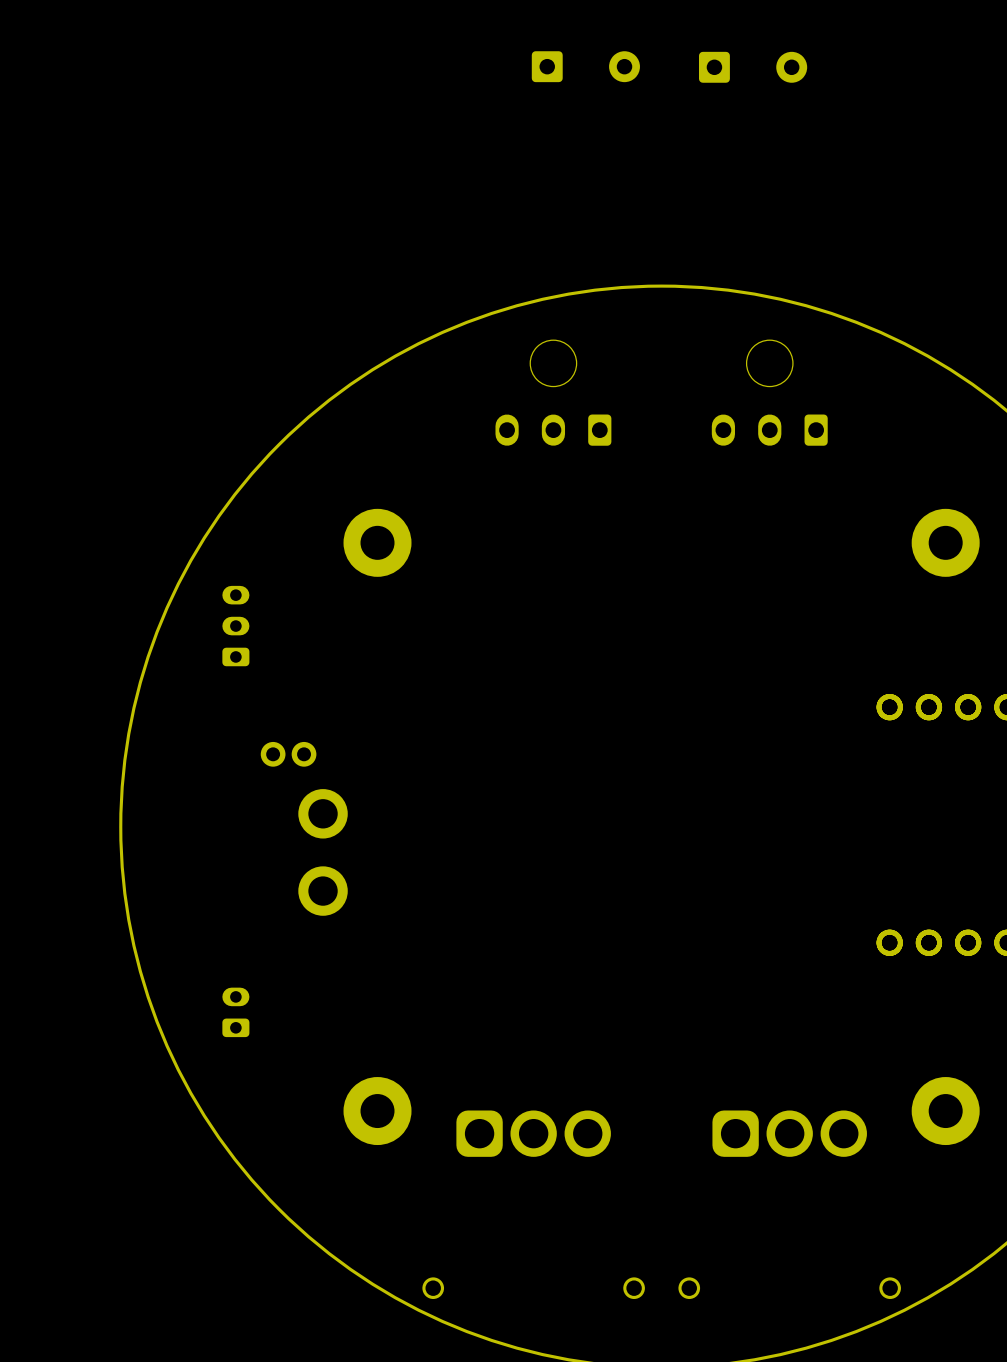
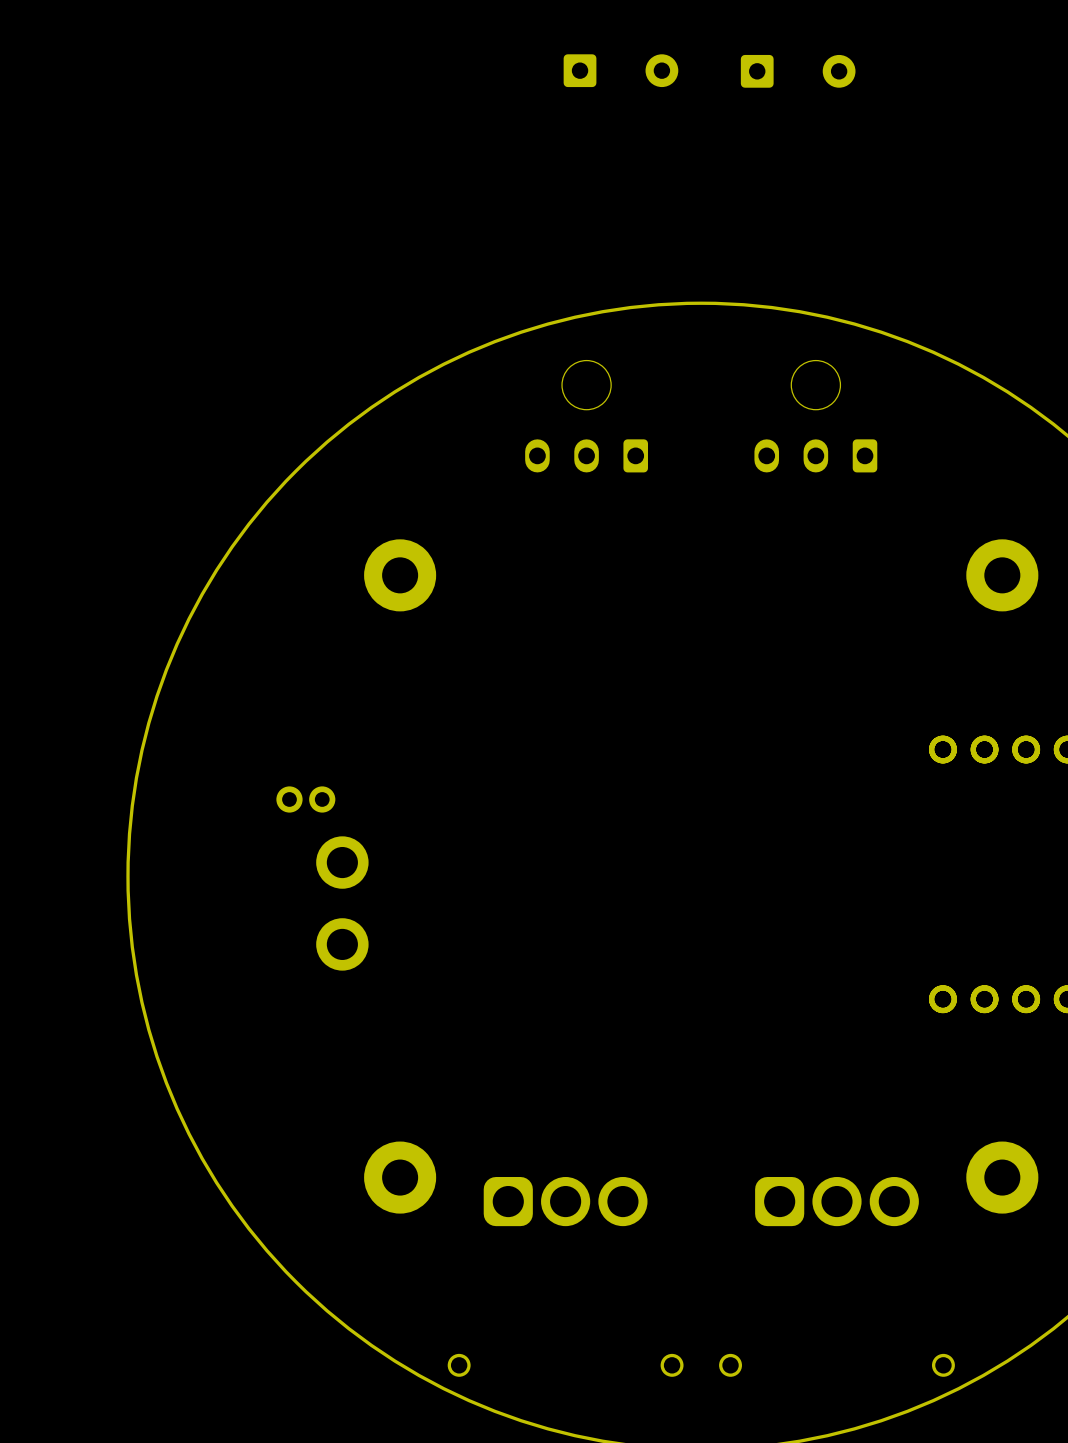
part: (235, 626) -> none
part: (235, 1012) -> none

